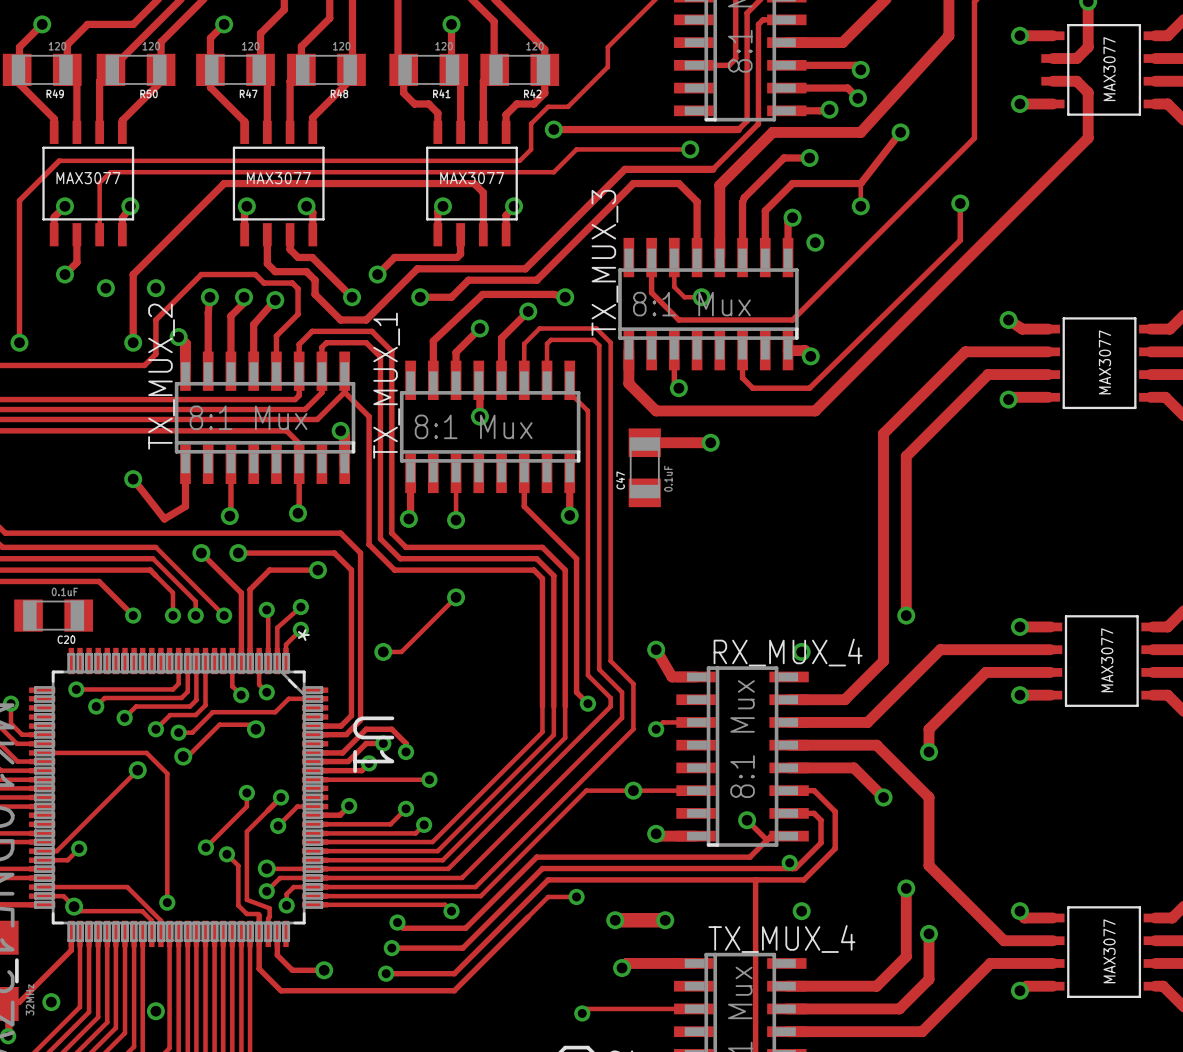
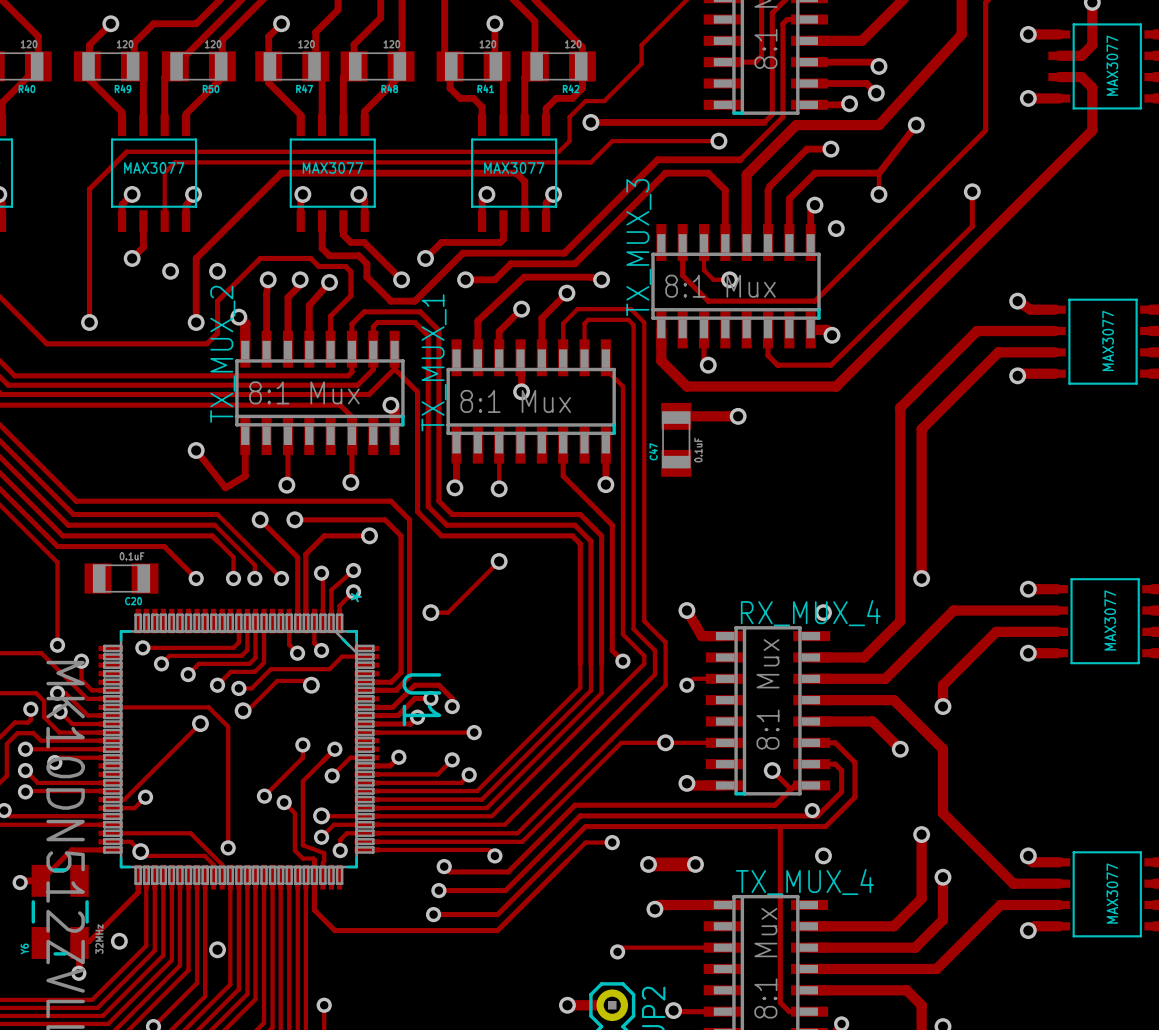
track: (277, 933) (277, 955) (292, 970) (324, 970) -> none
via: (324, 970) -> none

